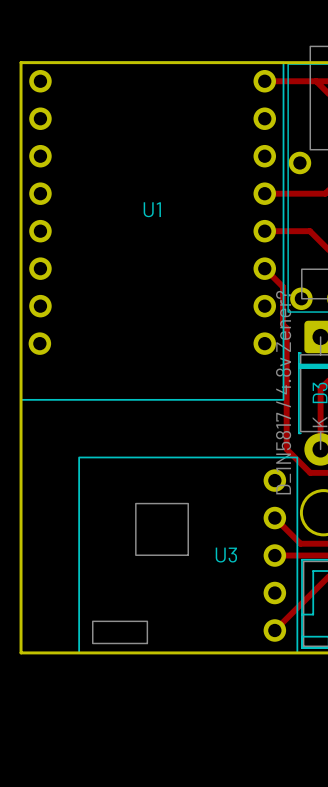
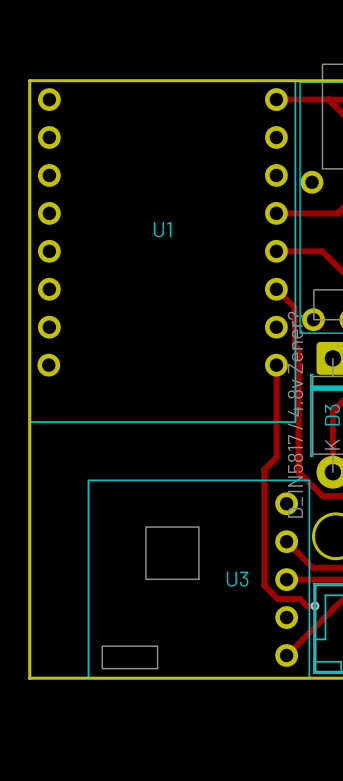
track: none -> (276, 365) (276, 457) (264, 469) (264, 585) (277, 599) (300, 599) (307, 605) (314, 605)
via: none -> (314, 605)

